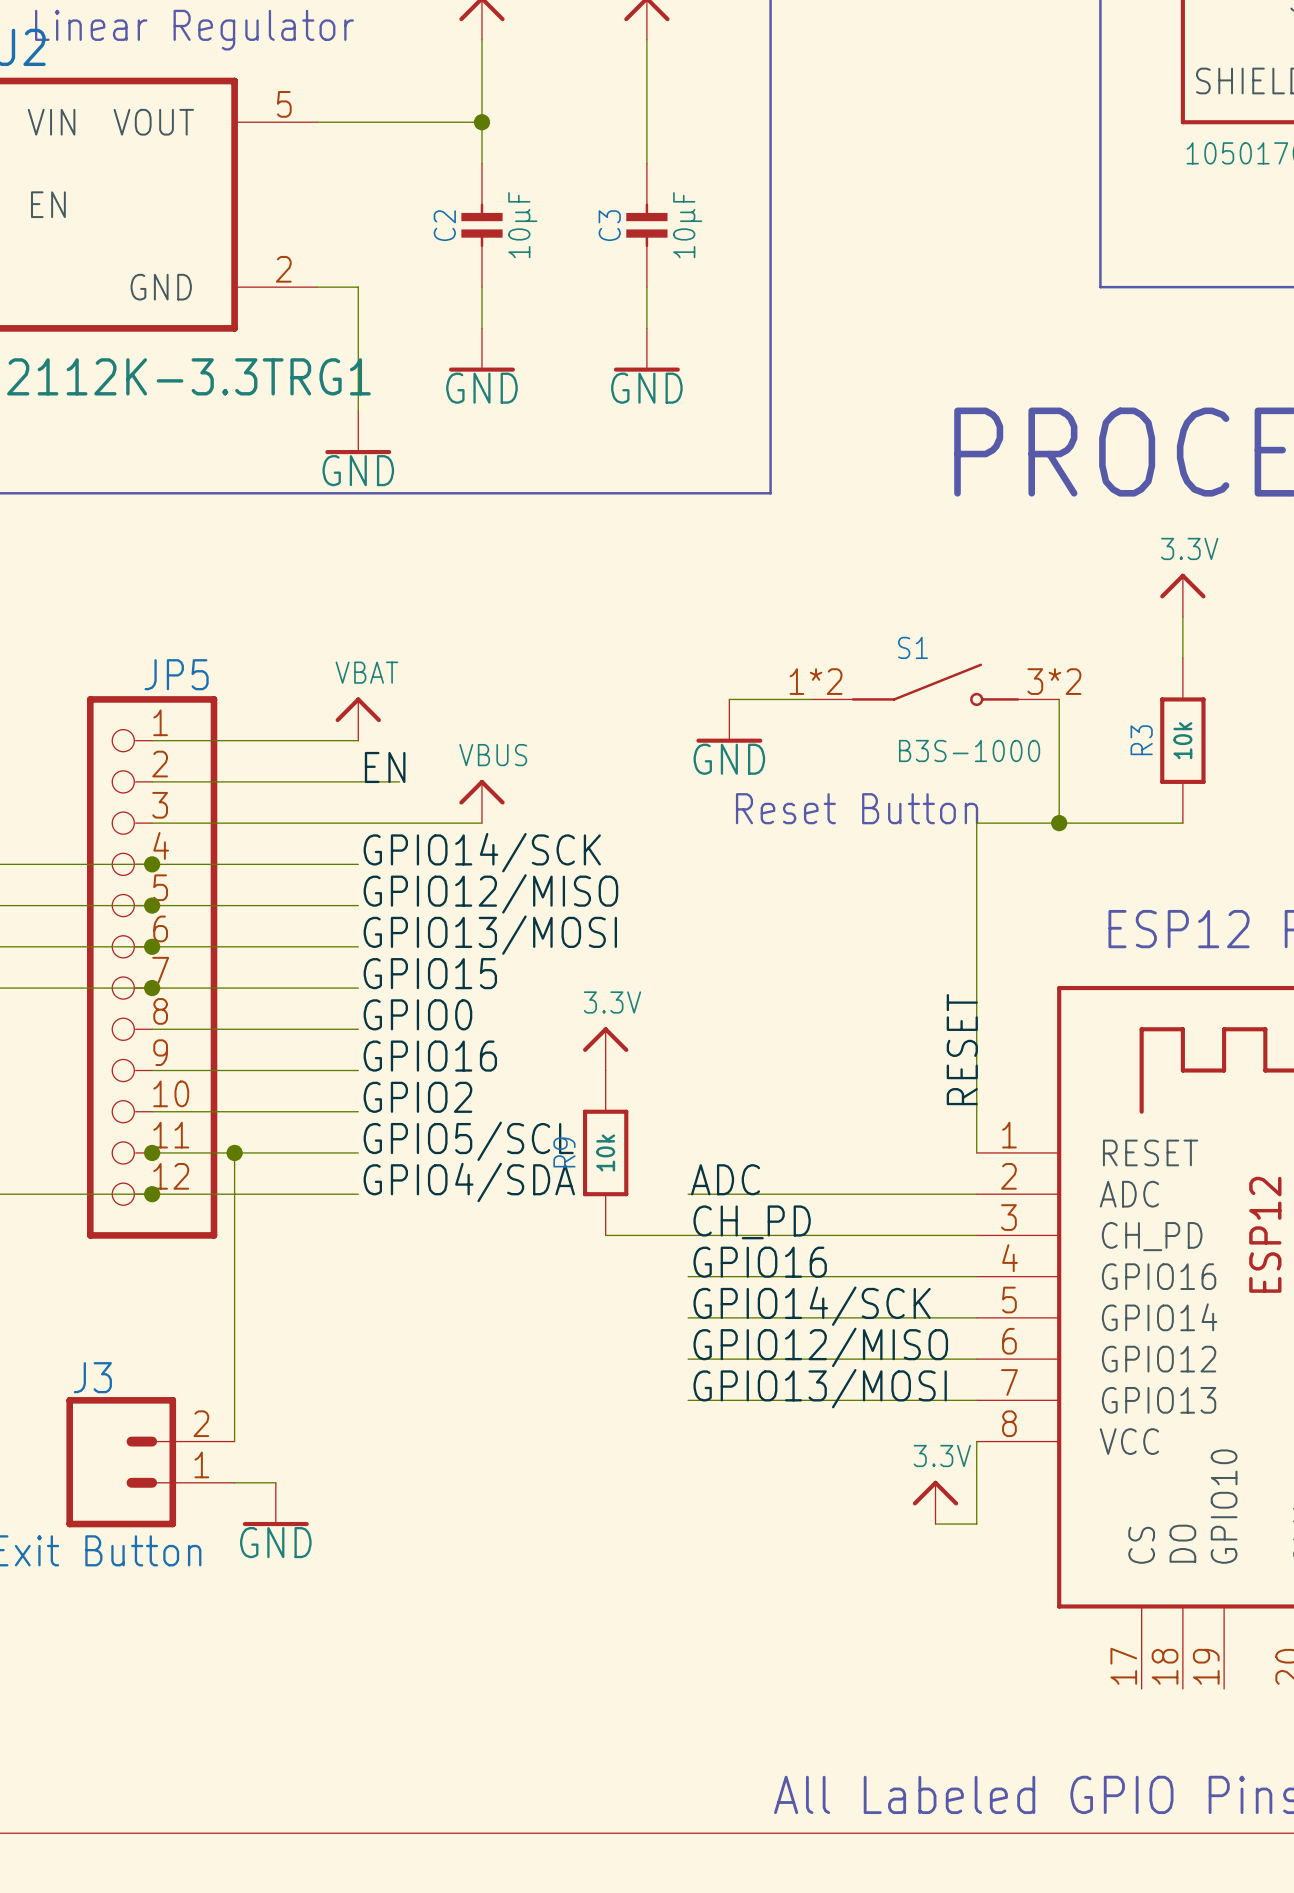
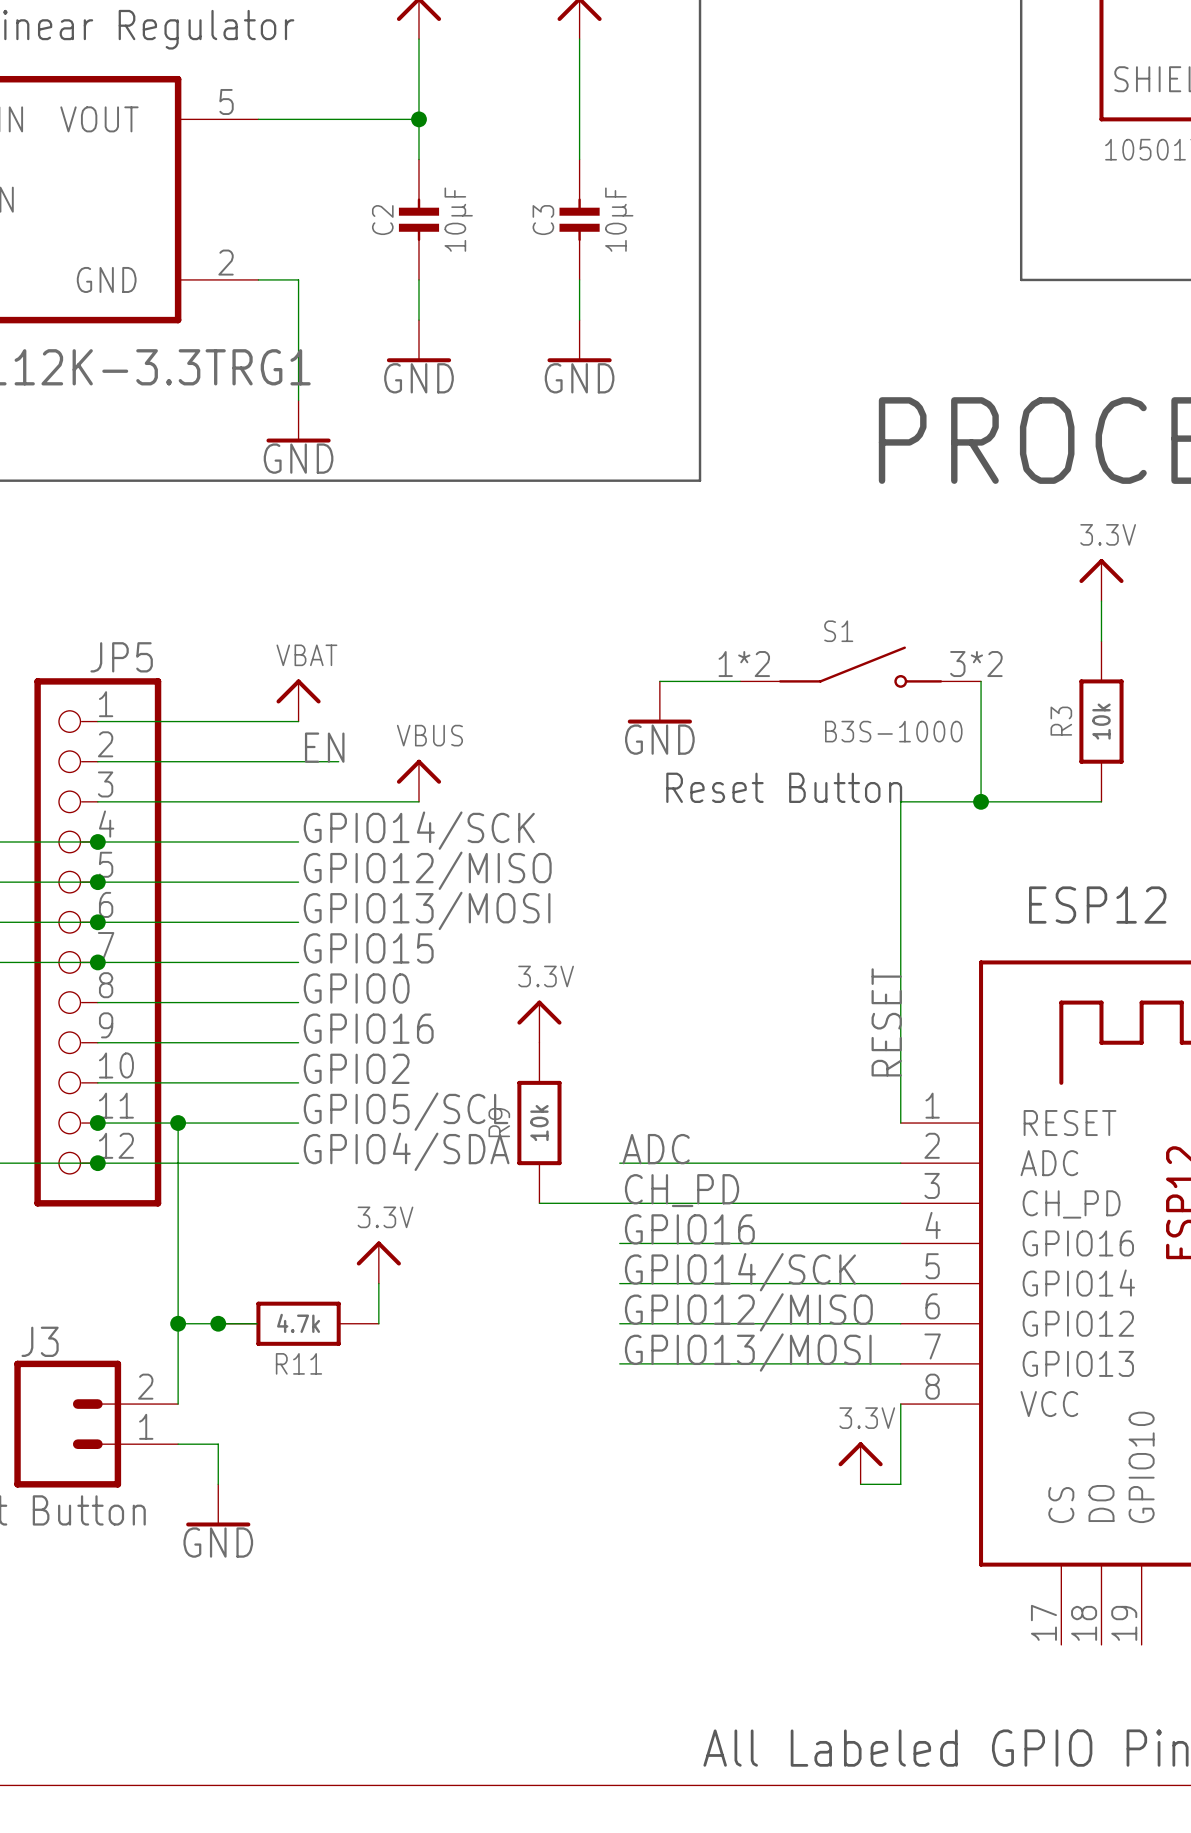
power symbol: none -> 3.3V (378, 1262)
wire: none -> (378, 1283) (378, 1323)
wire: none -> (178, 1323) (257, 1323)
junction: none -> (178, 1323)
junction: none -> (218, 1323)
R11: none -> 4.7k (298, 1323)
power symbol position: GND (275, 1504) -> GND (218, 1505)

